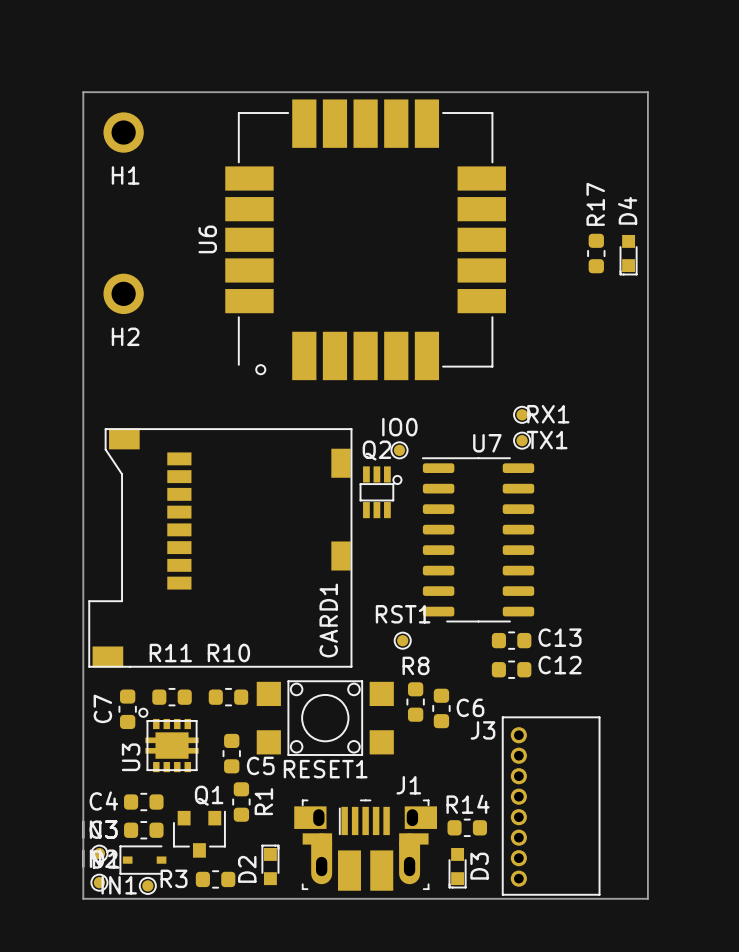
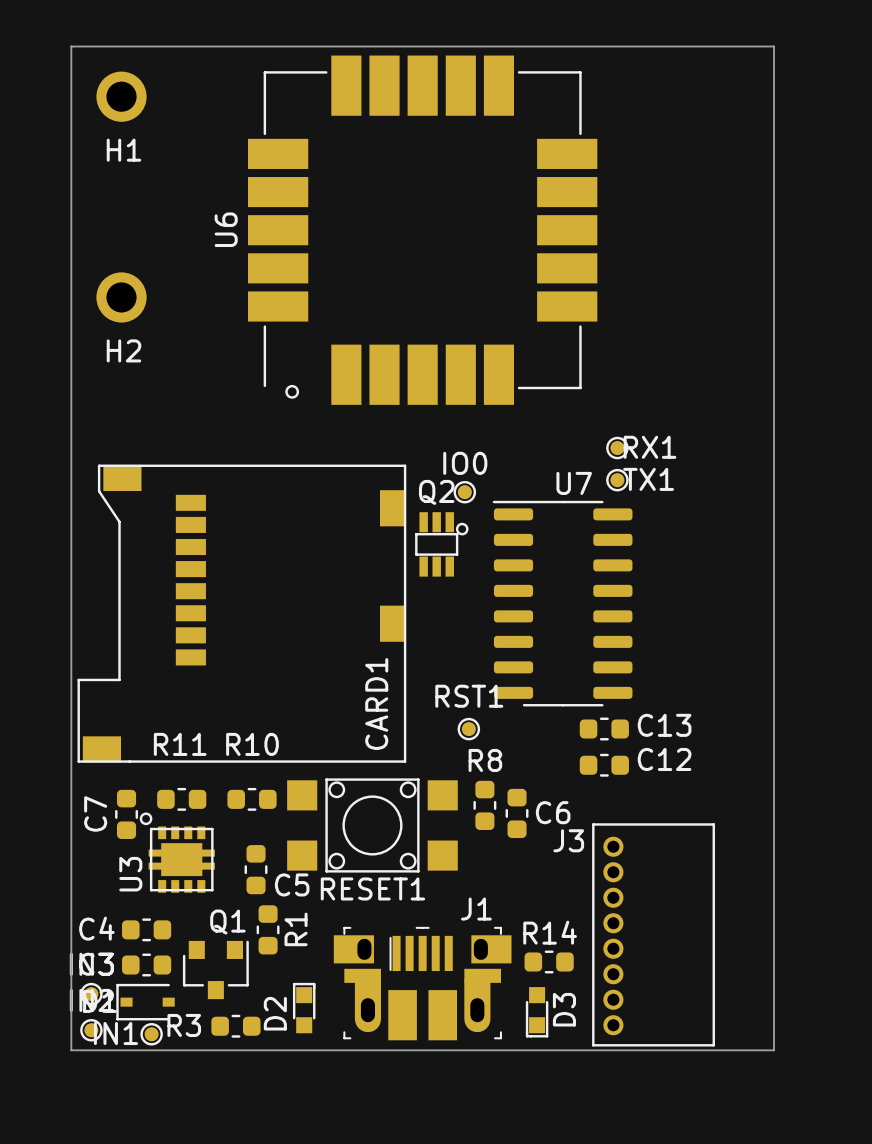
R17: (596, 253) -> none
D4: (628, 255) -> none

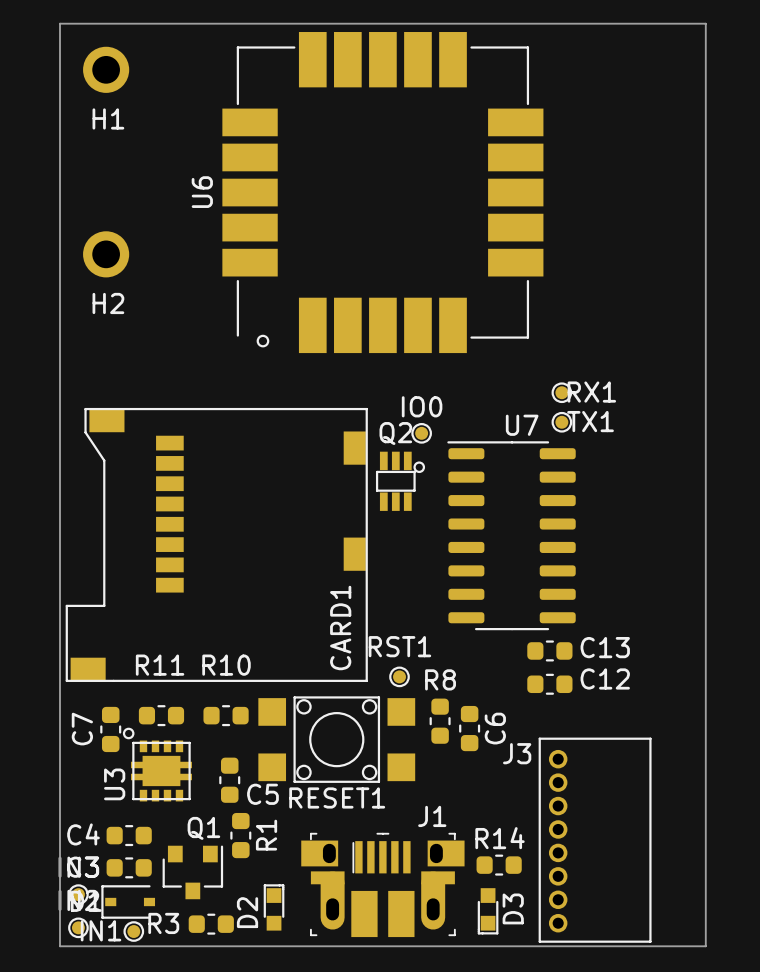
RST1 position: (468, 729) -> (399, 676)
C6 name rotation: 0° (553, 812) -> 90° counterclockwise (495, 728)

